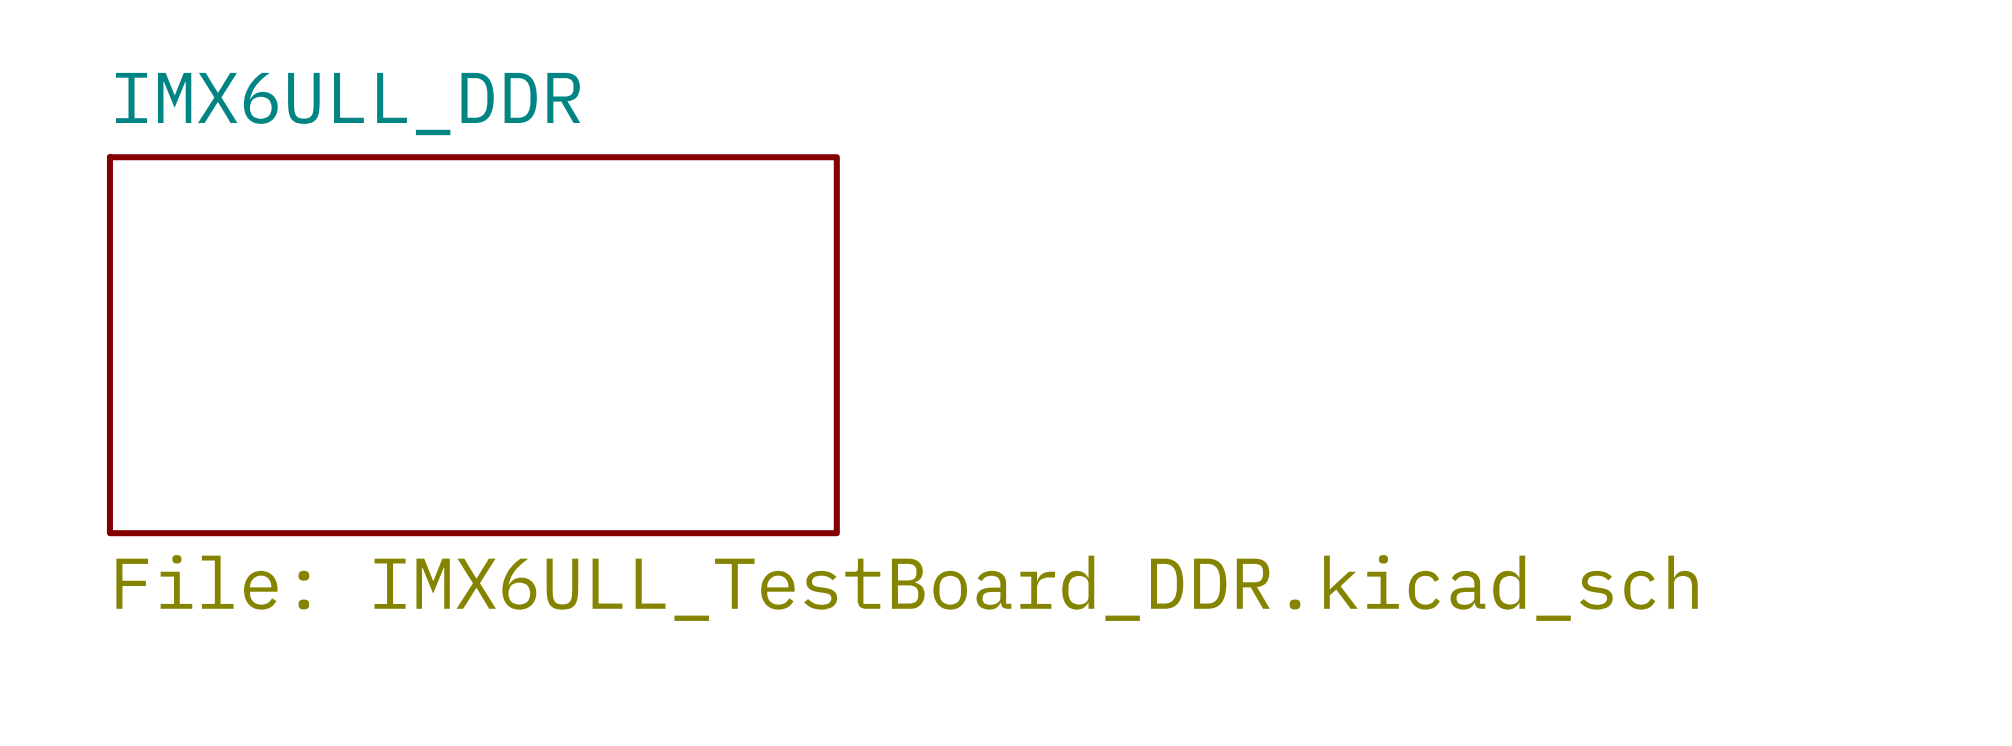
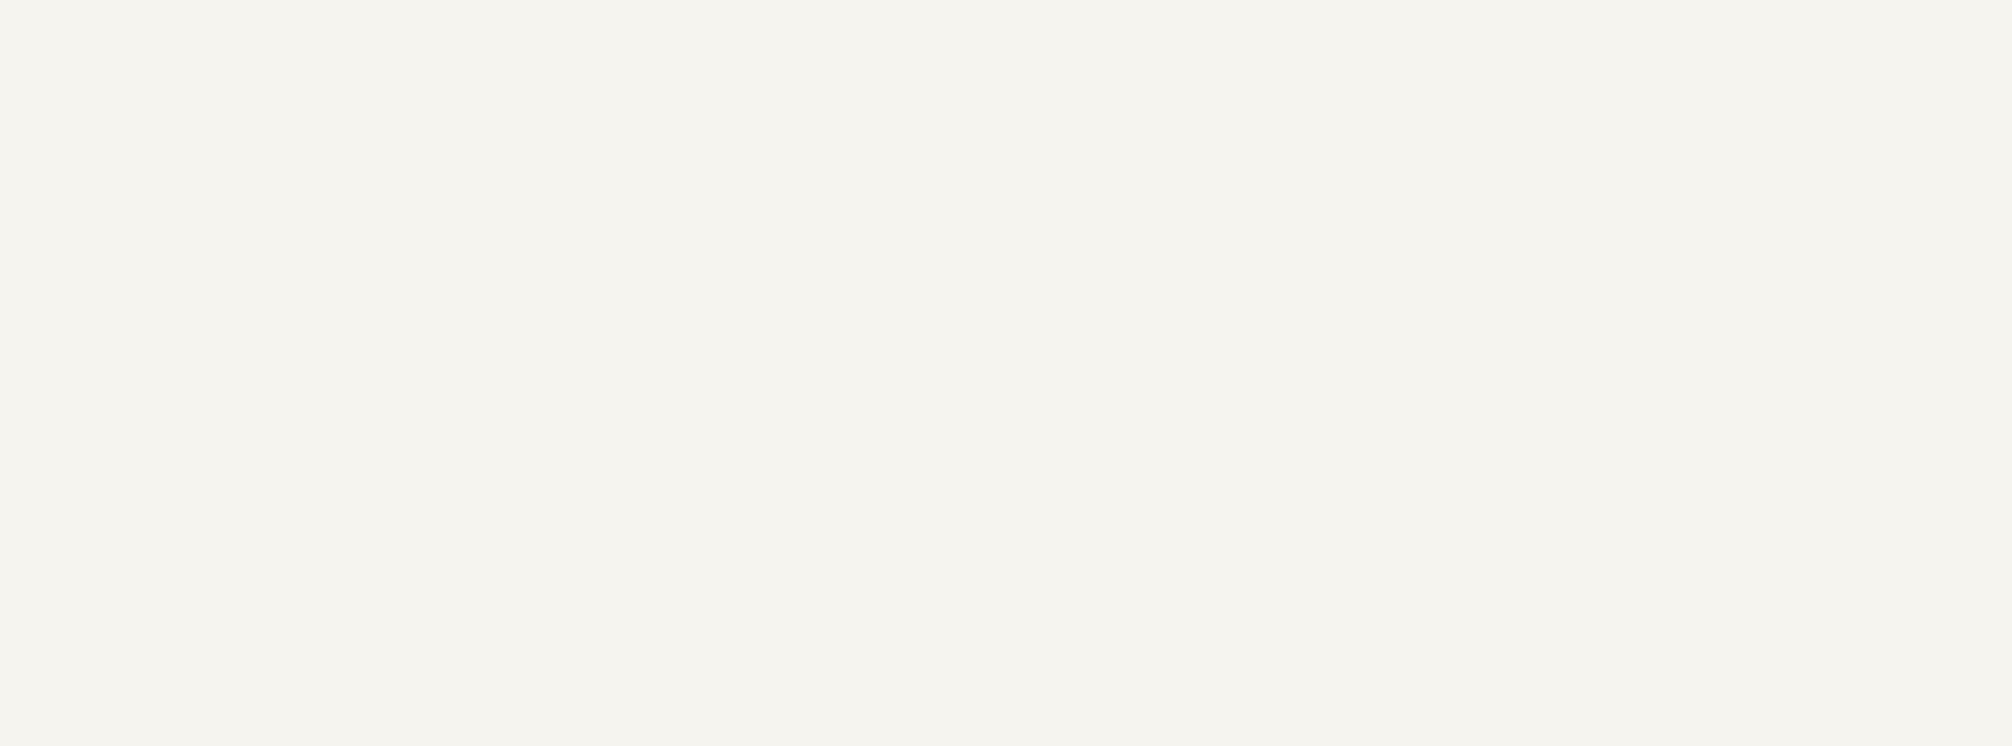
sheet IMX6ULL_DDR: File: IMX6ULL_TestBoard_DDR.kicad_sch (473, 345) -> none

